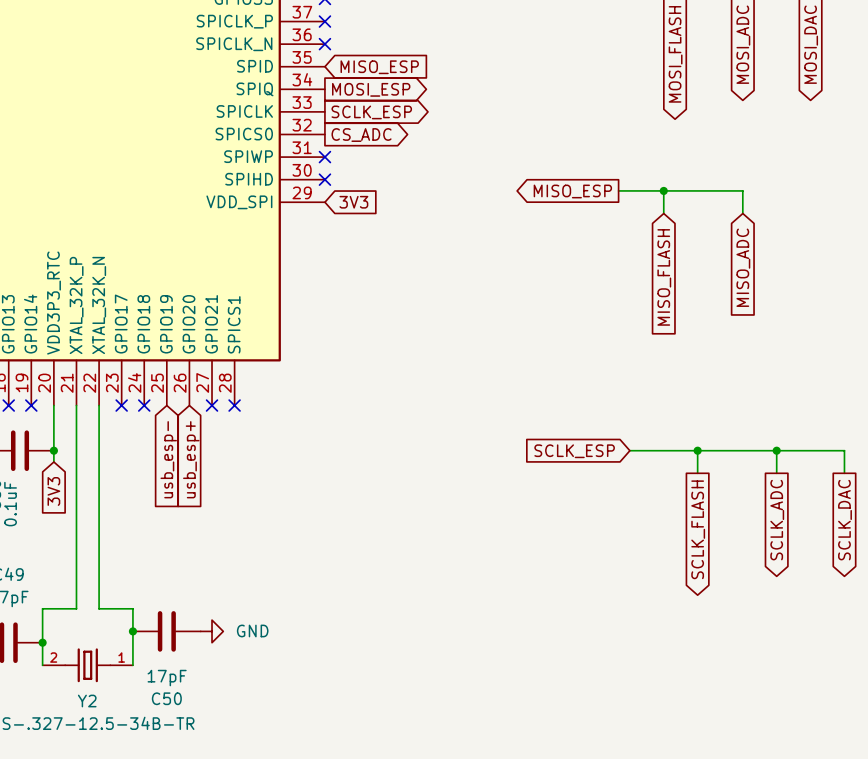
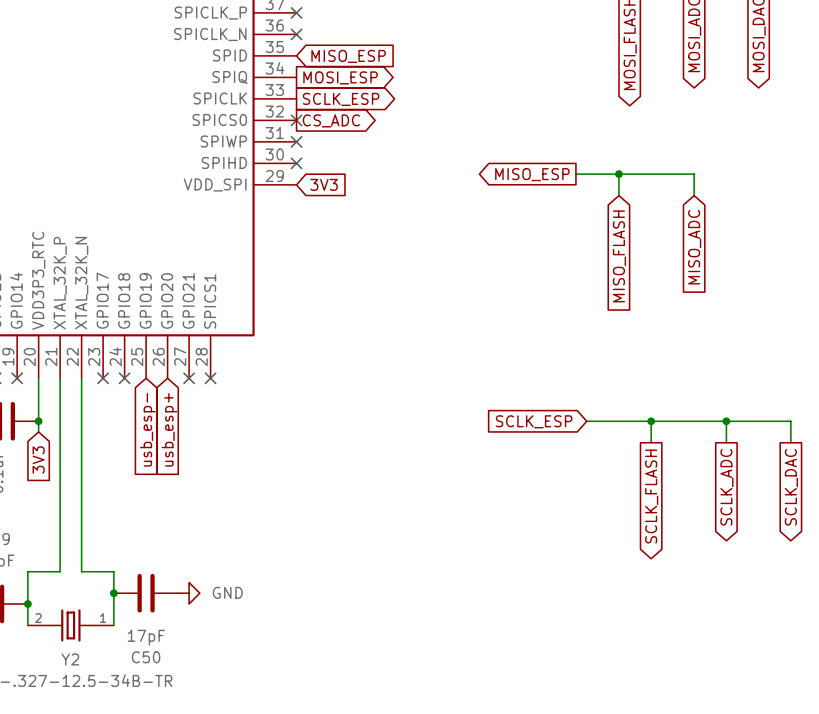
no-connect mark: none -> (296, 120)

